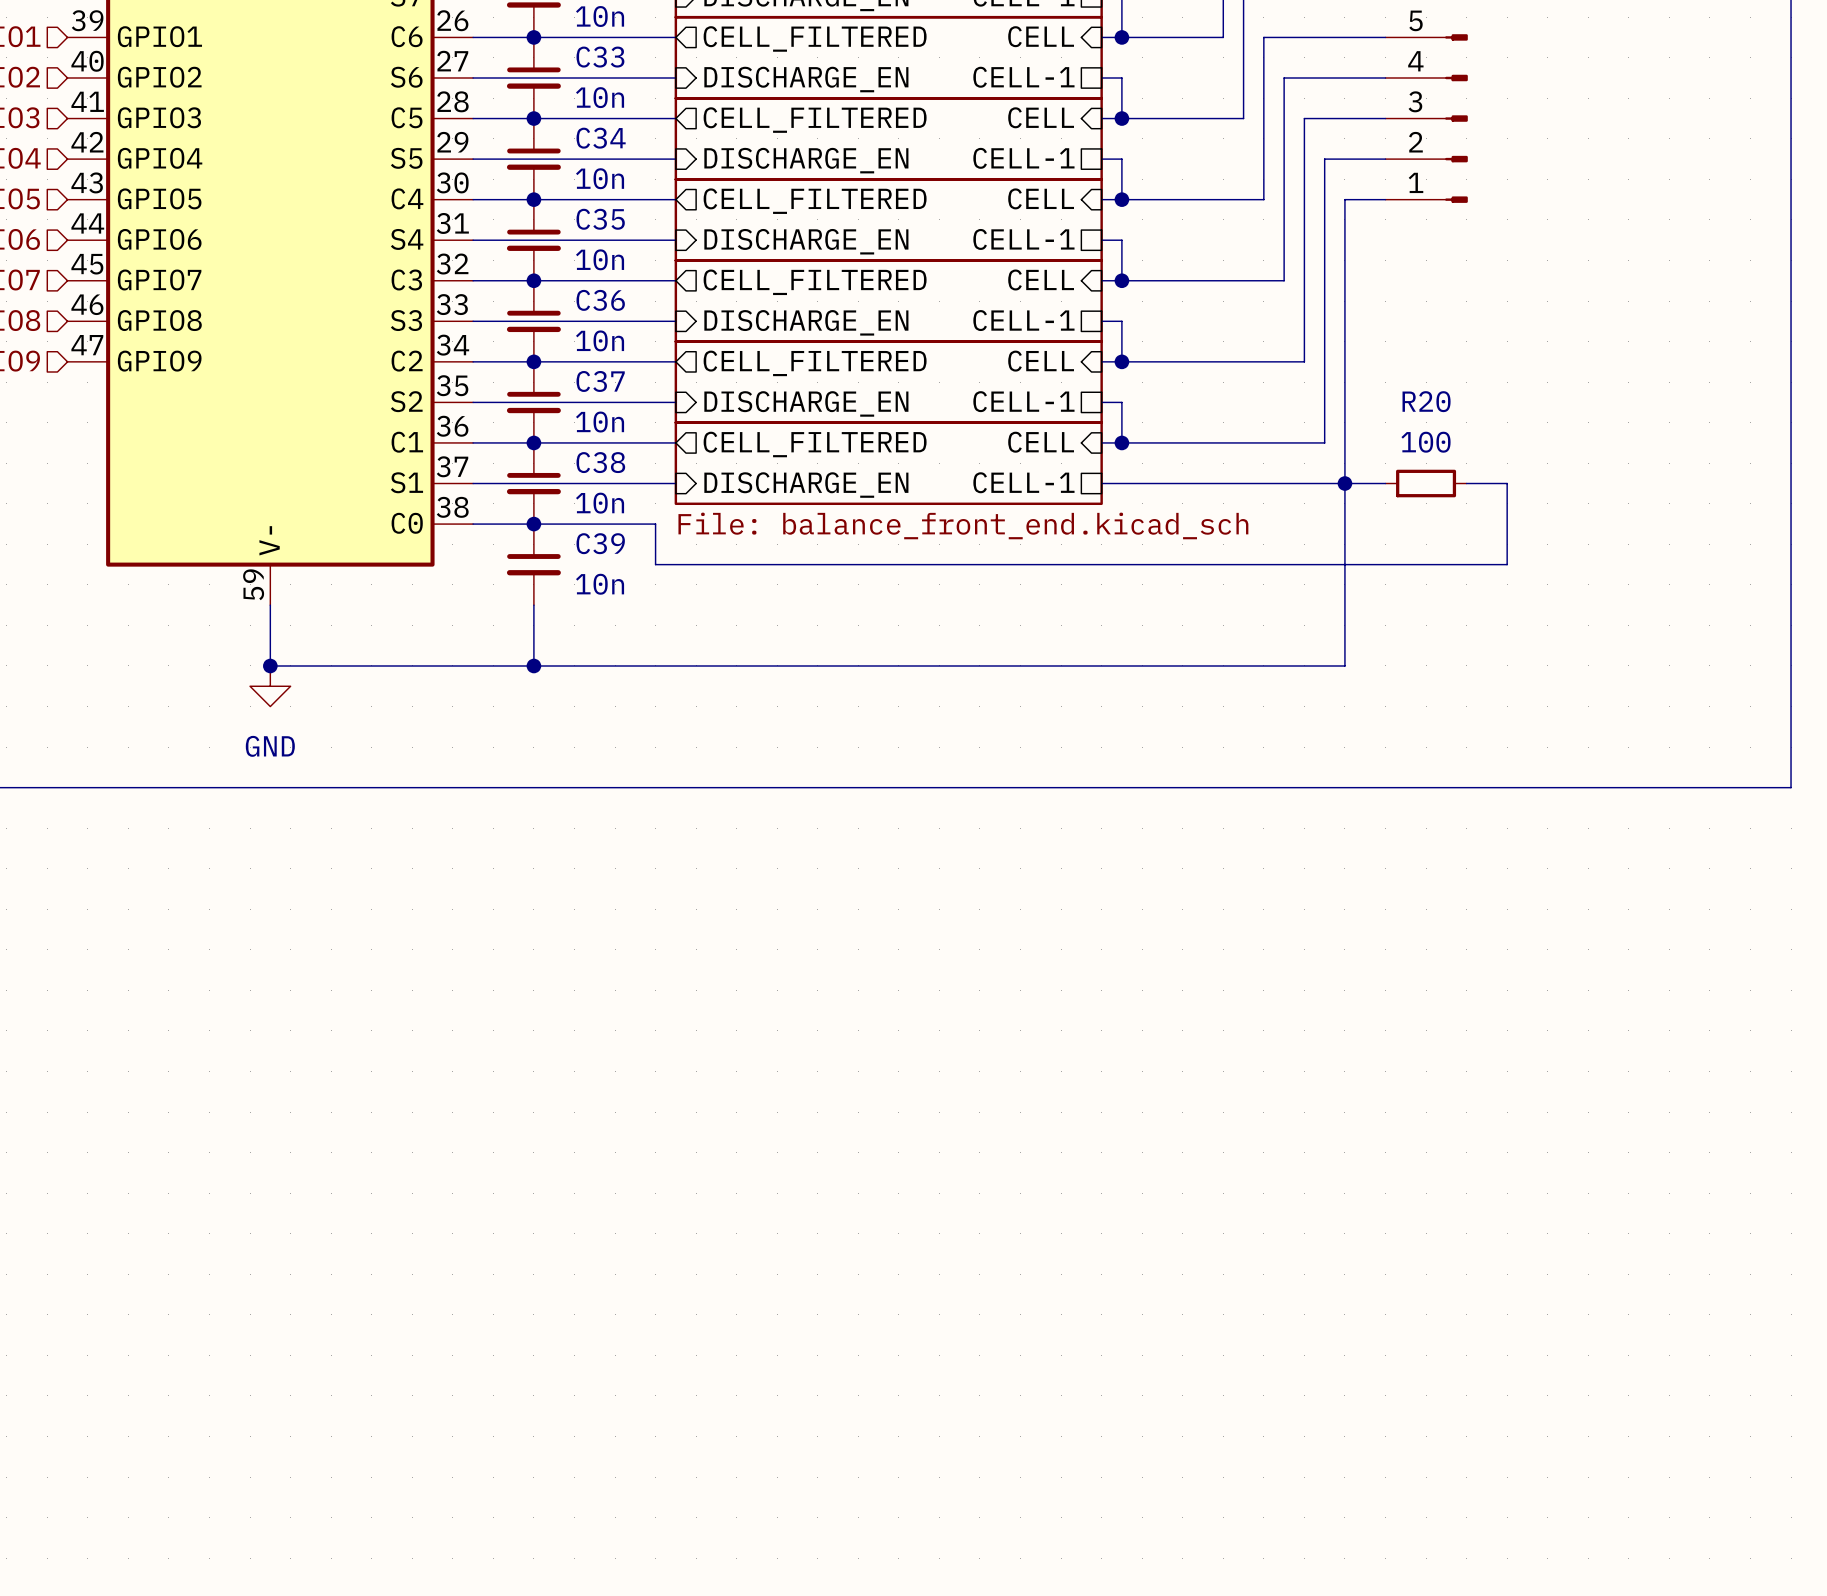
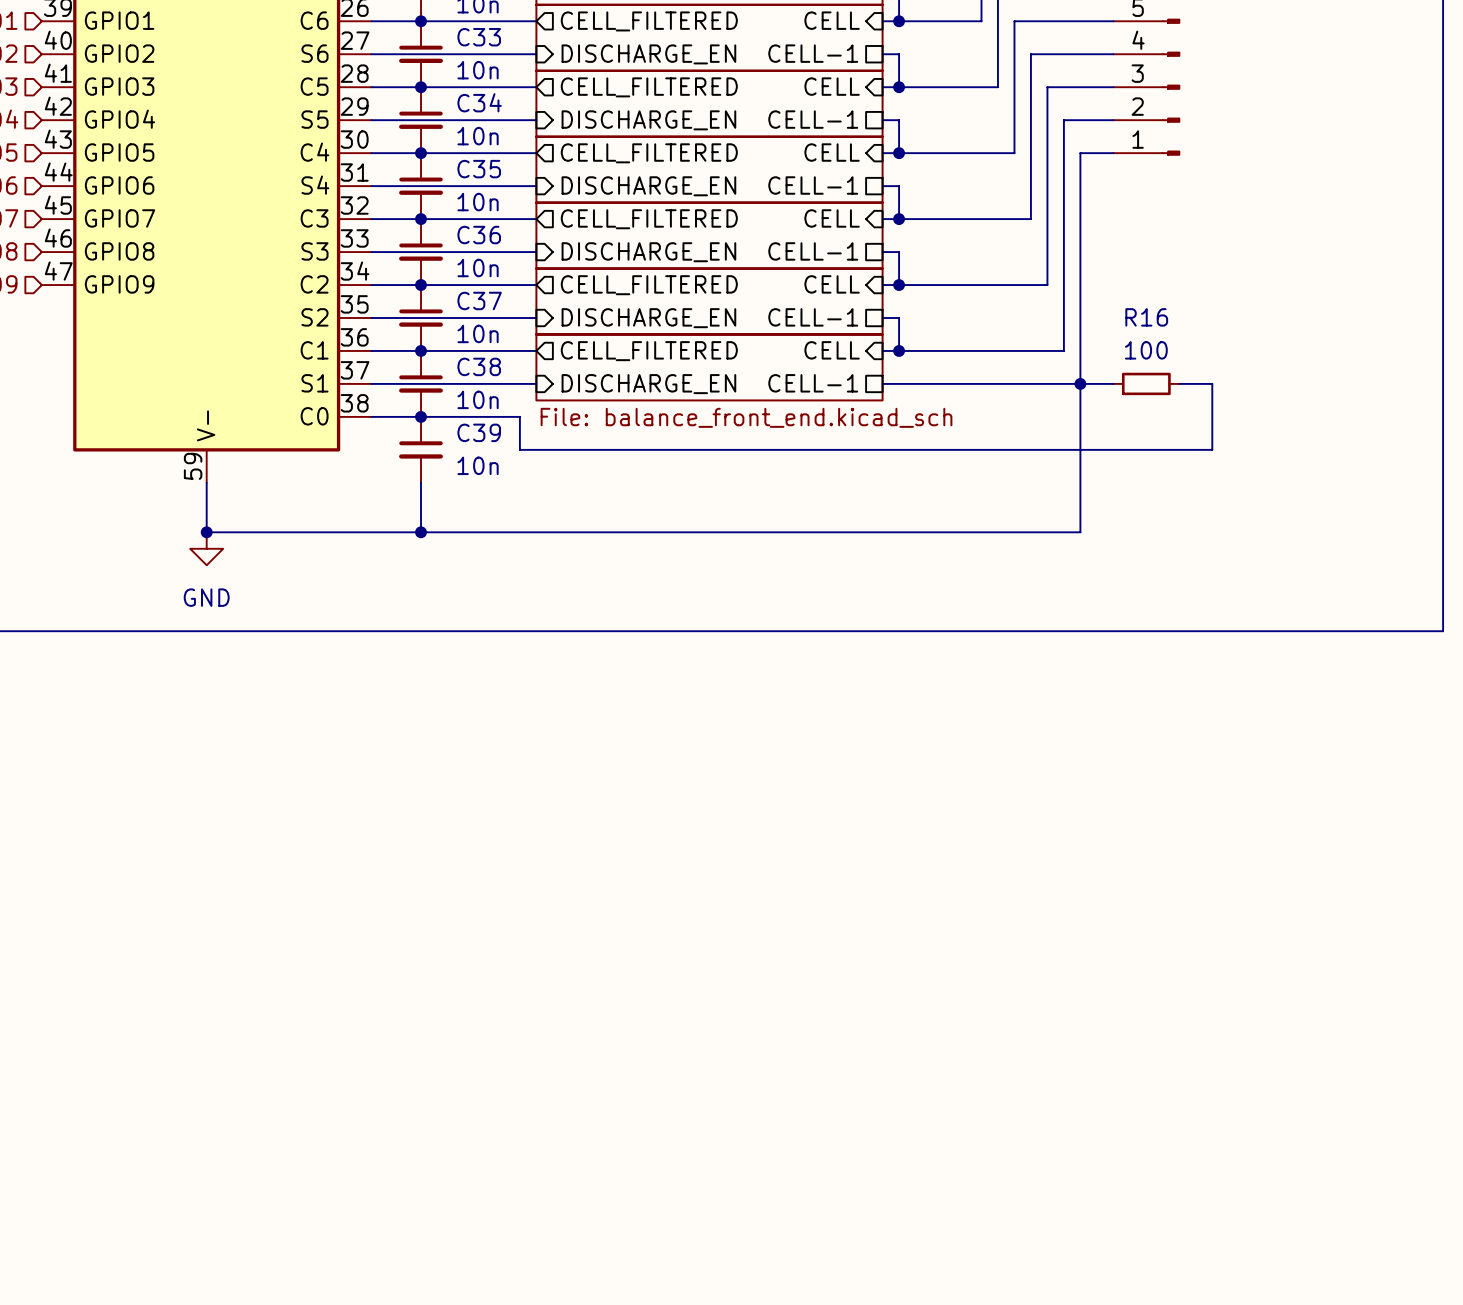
R20 name: R20 (1426, 401) -> R16 (1146, 317)

